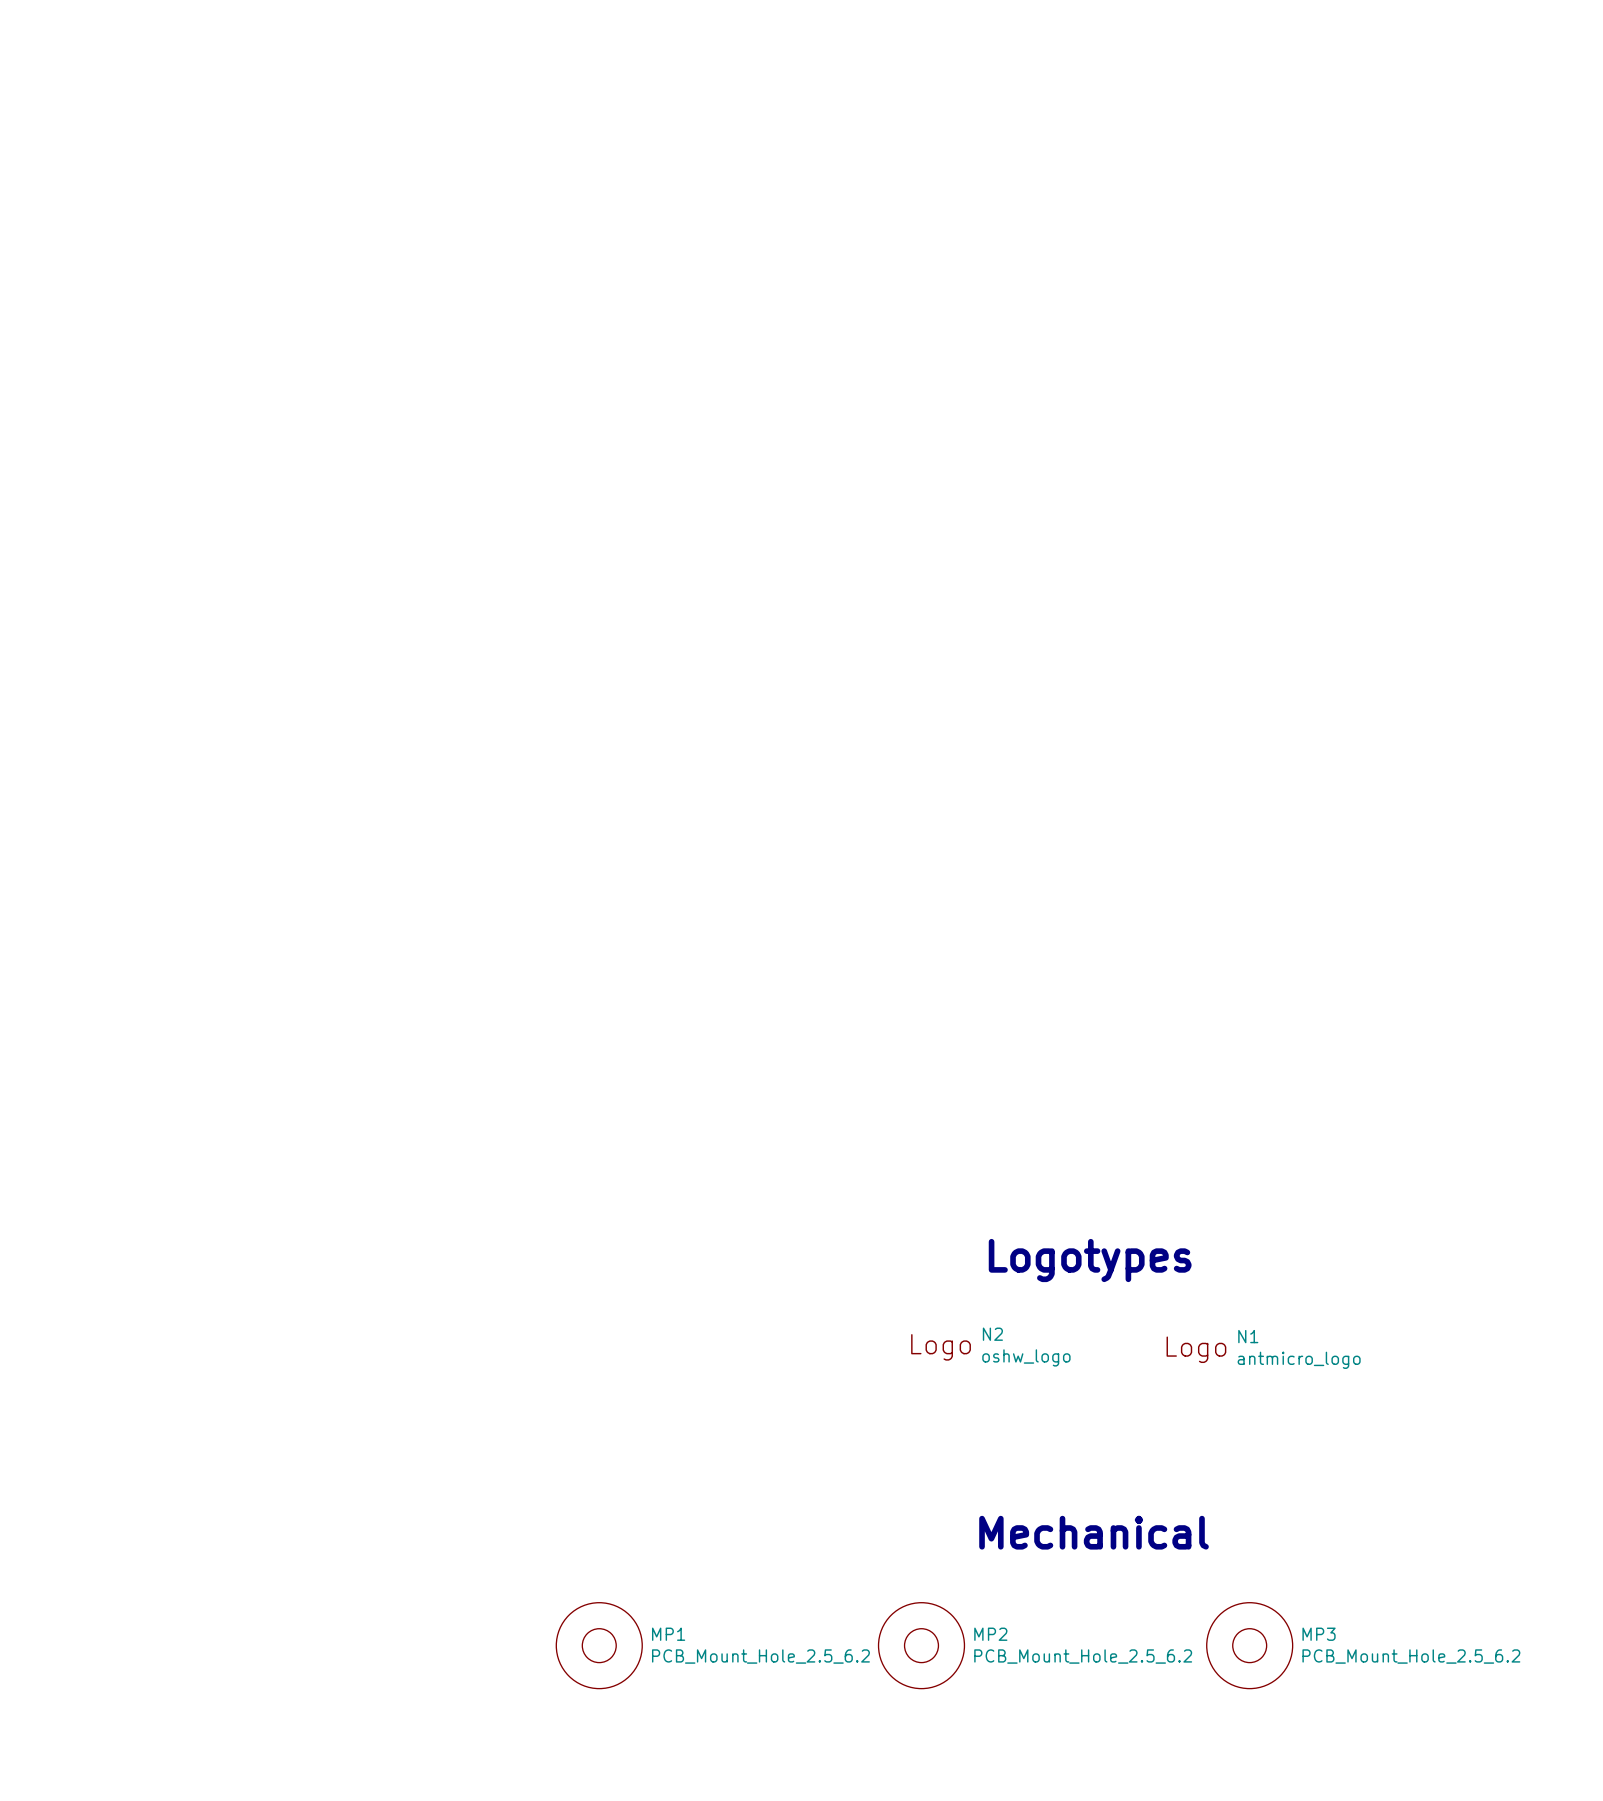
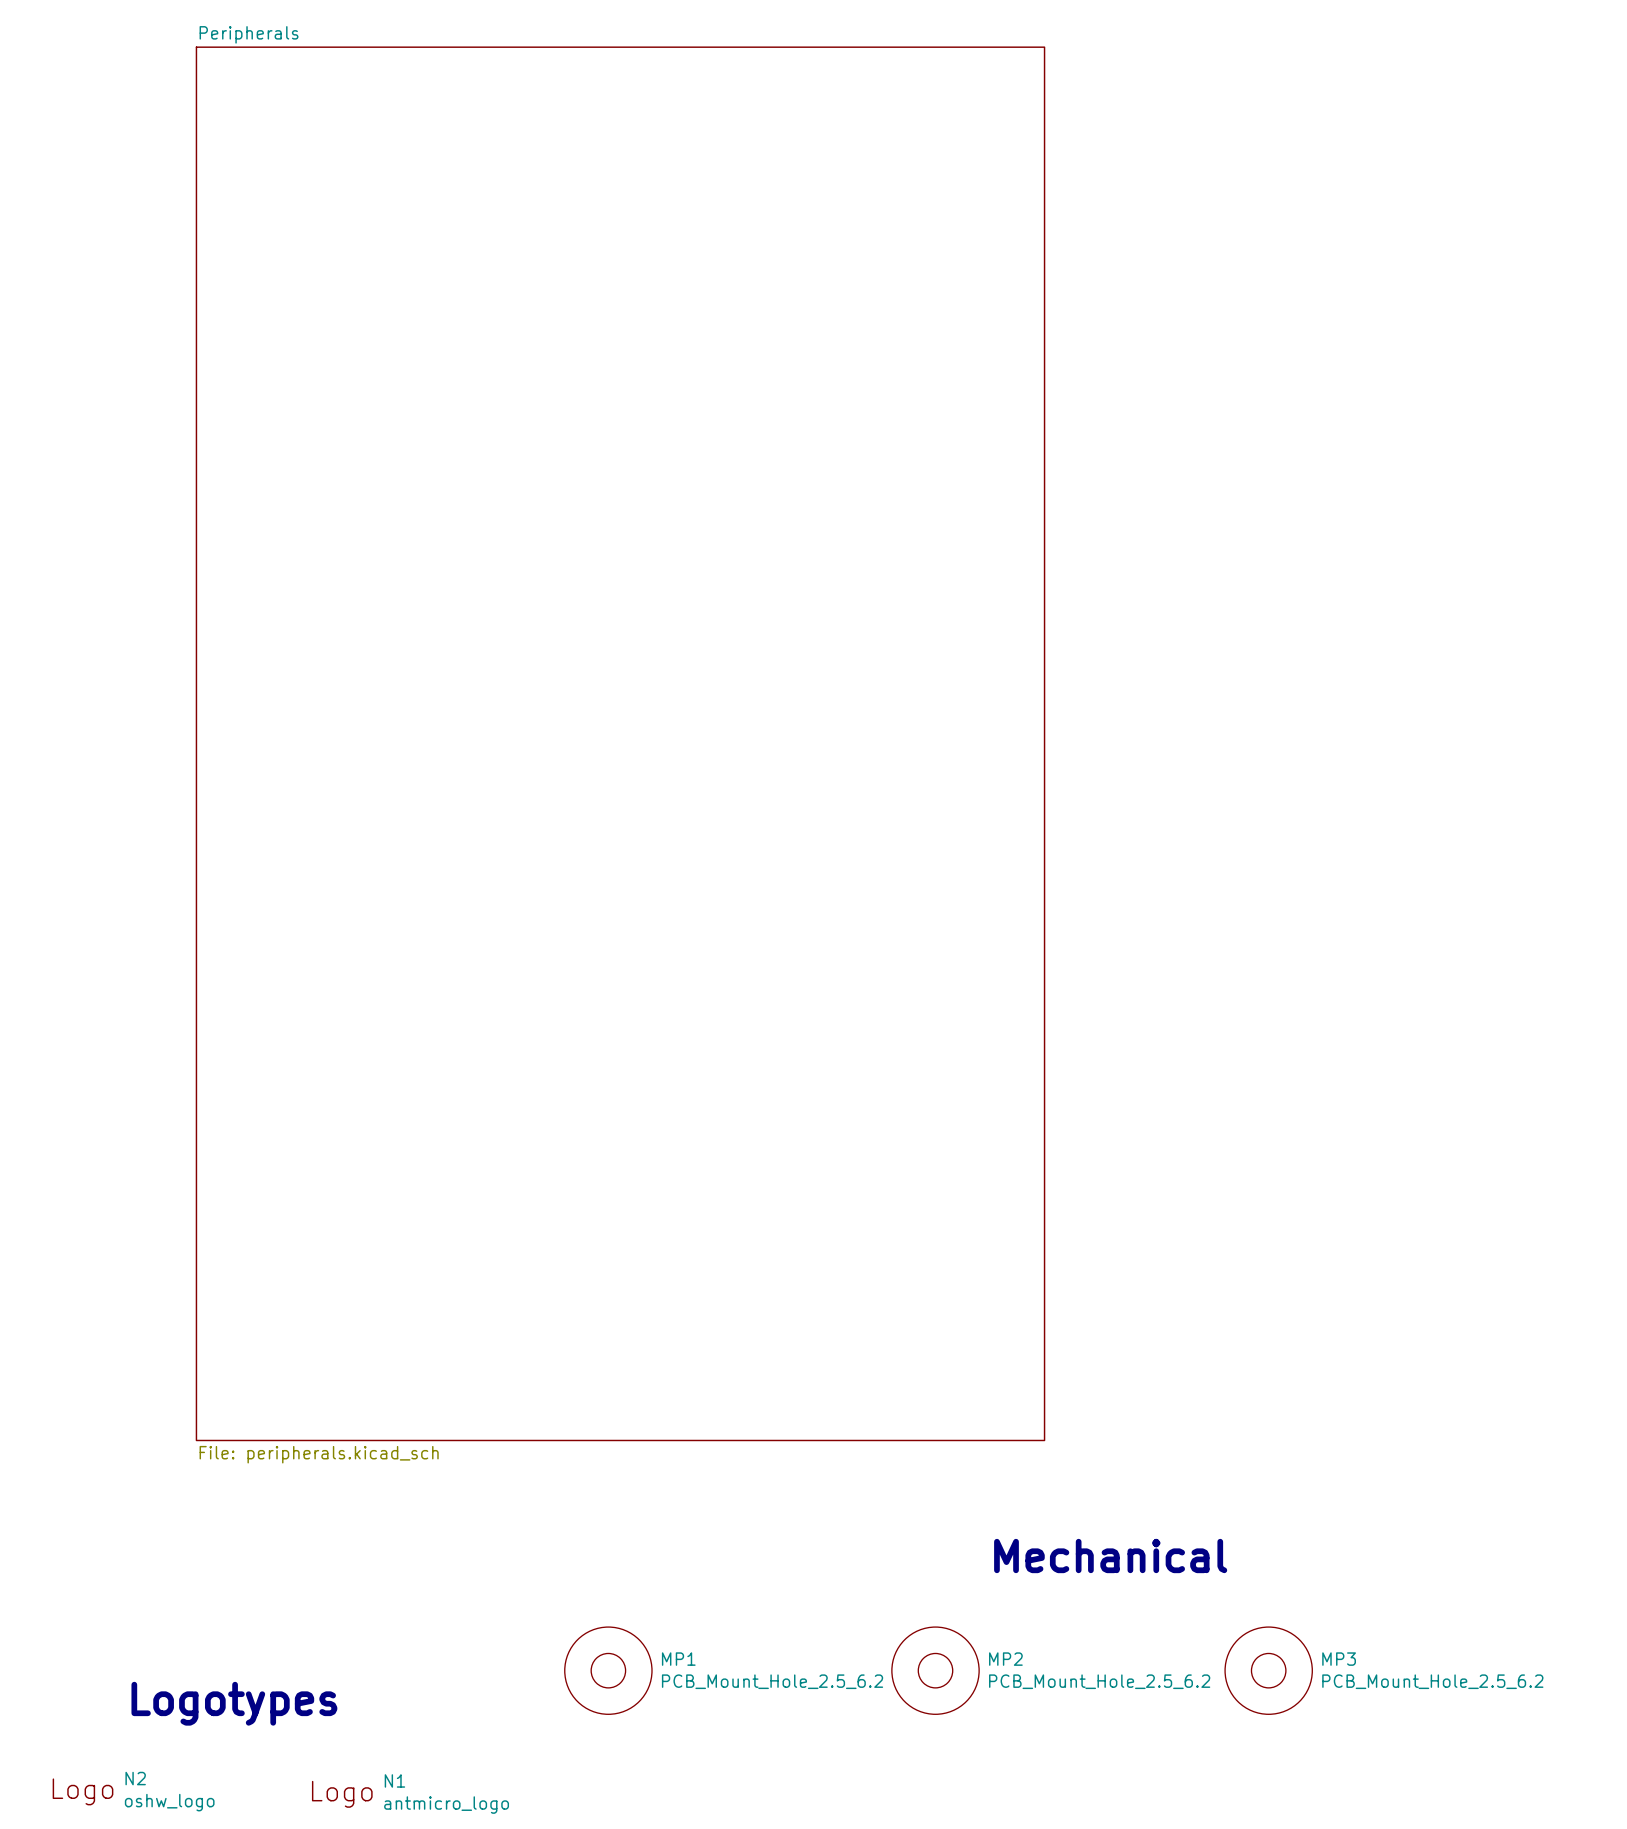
sheet Peripherals: none -> File: peripherals.kicad_sch (620, 743)
text: Logotypes (1090, 1260) -> none
N2 position: (990, 1347) -> (133, 1791)
N1 position: (1263, 1349) -> (410, 1794)
text: none -> Logotypes (234, 1703)

